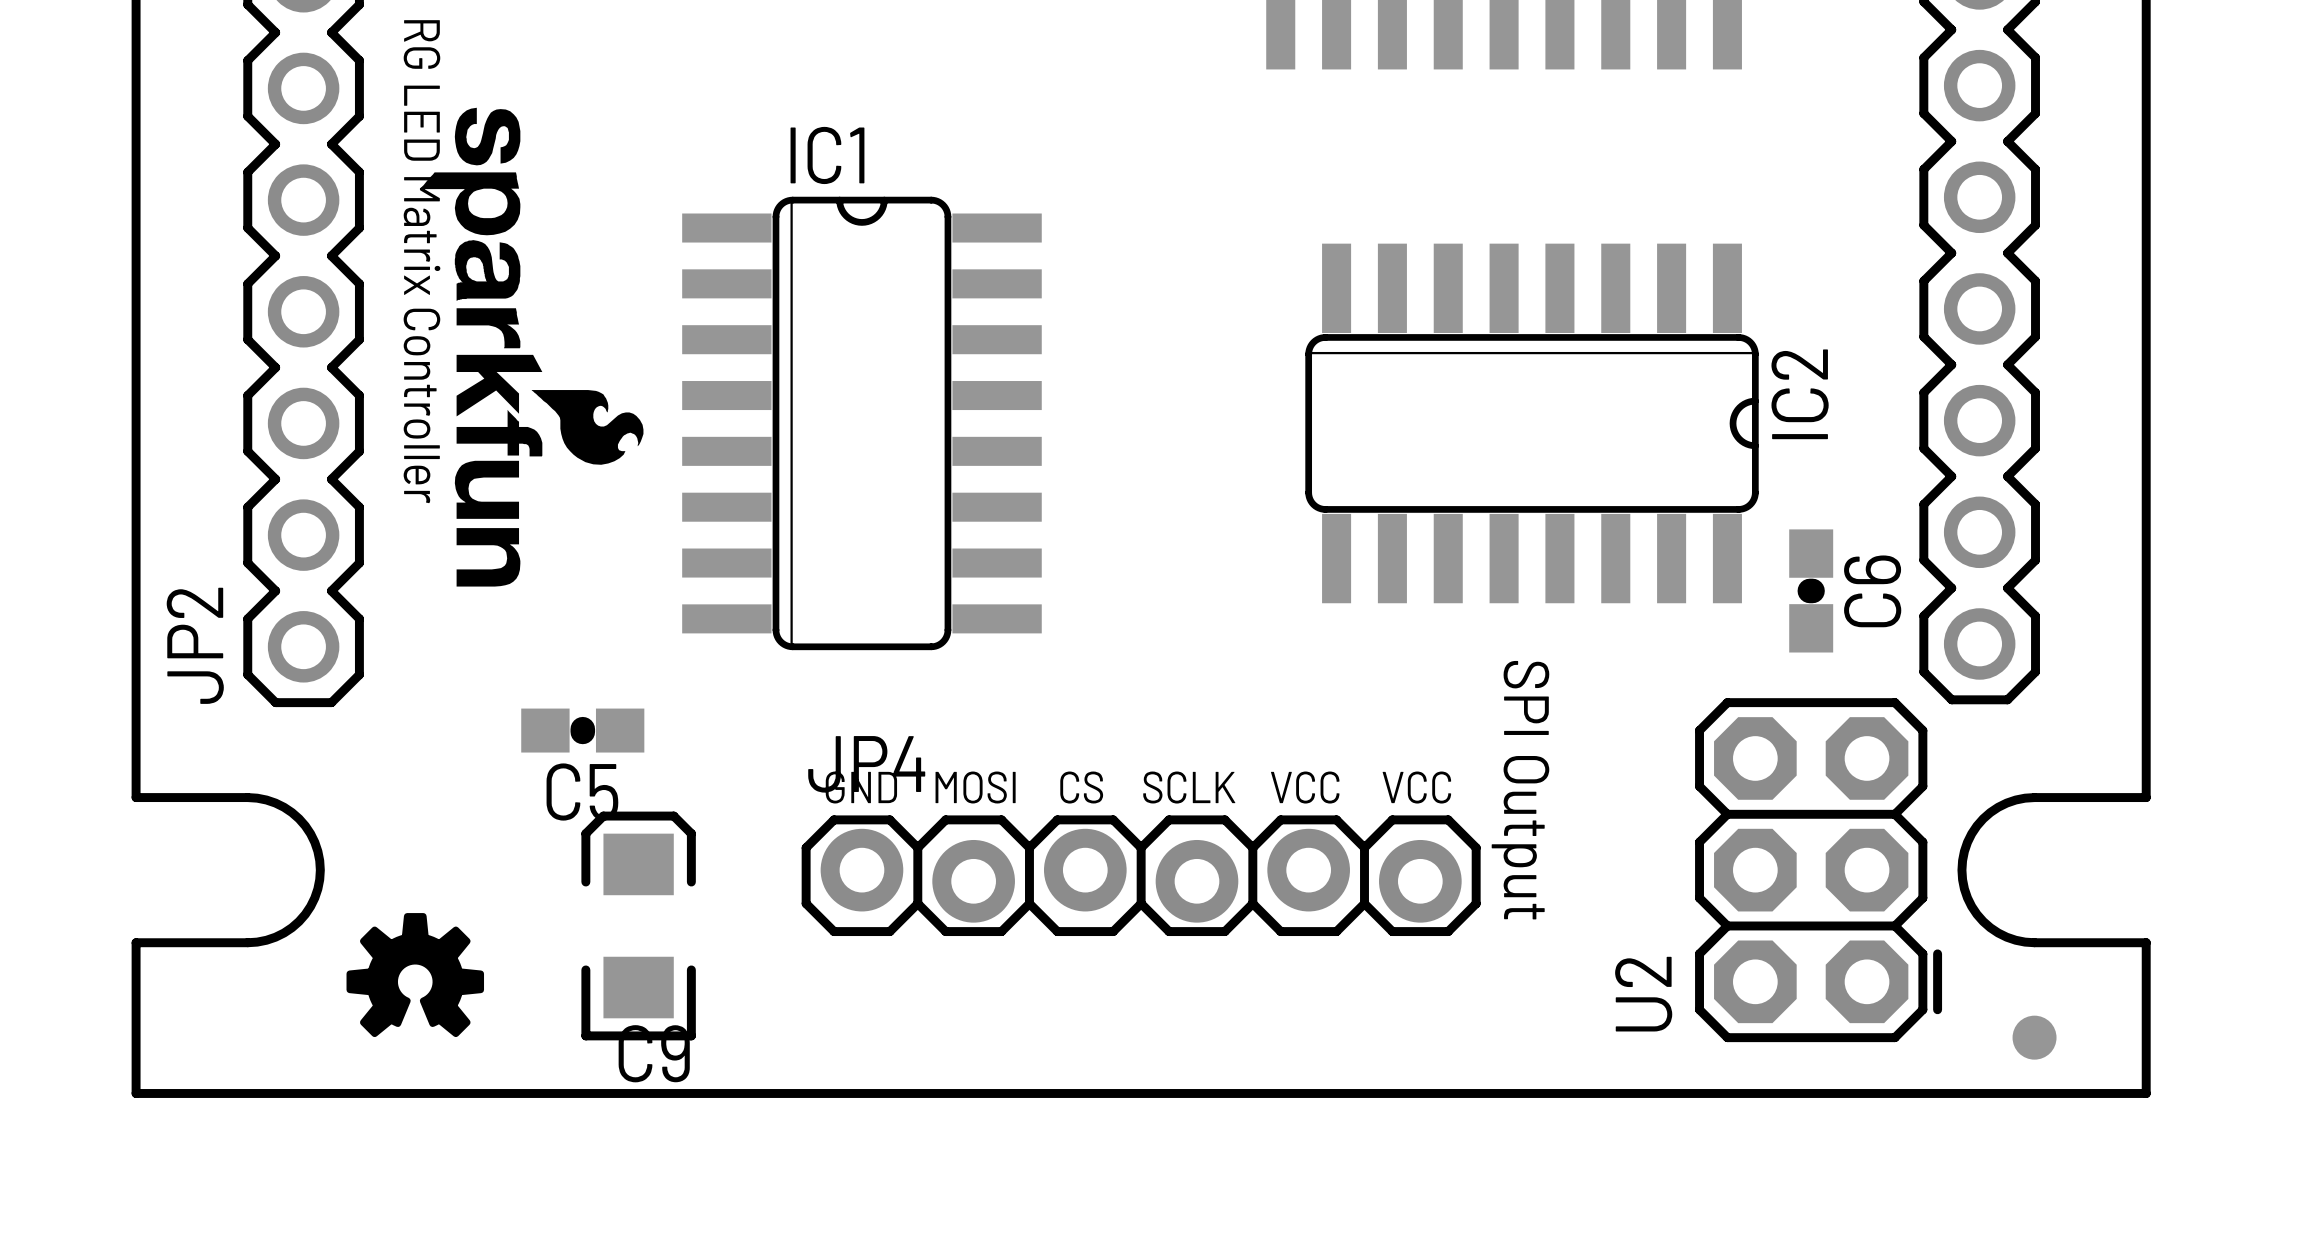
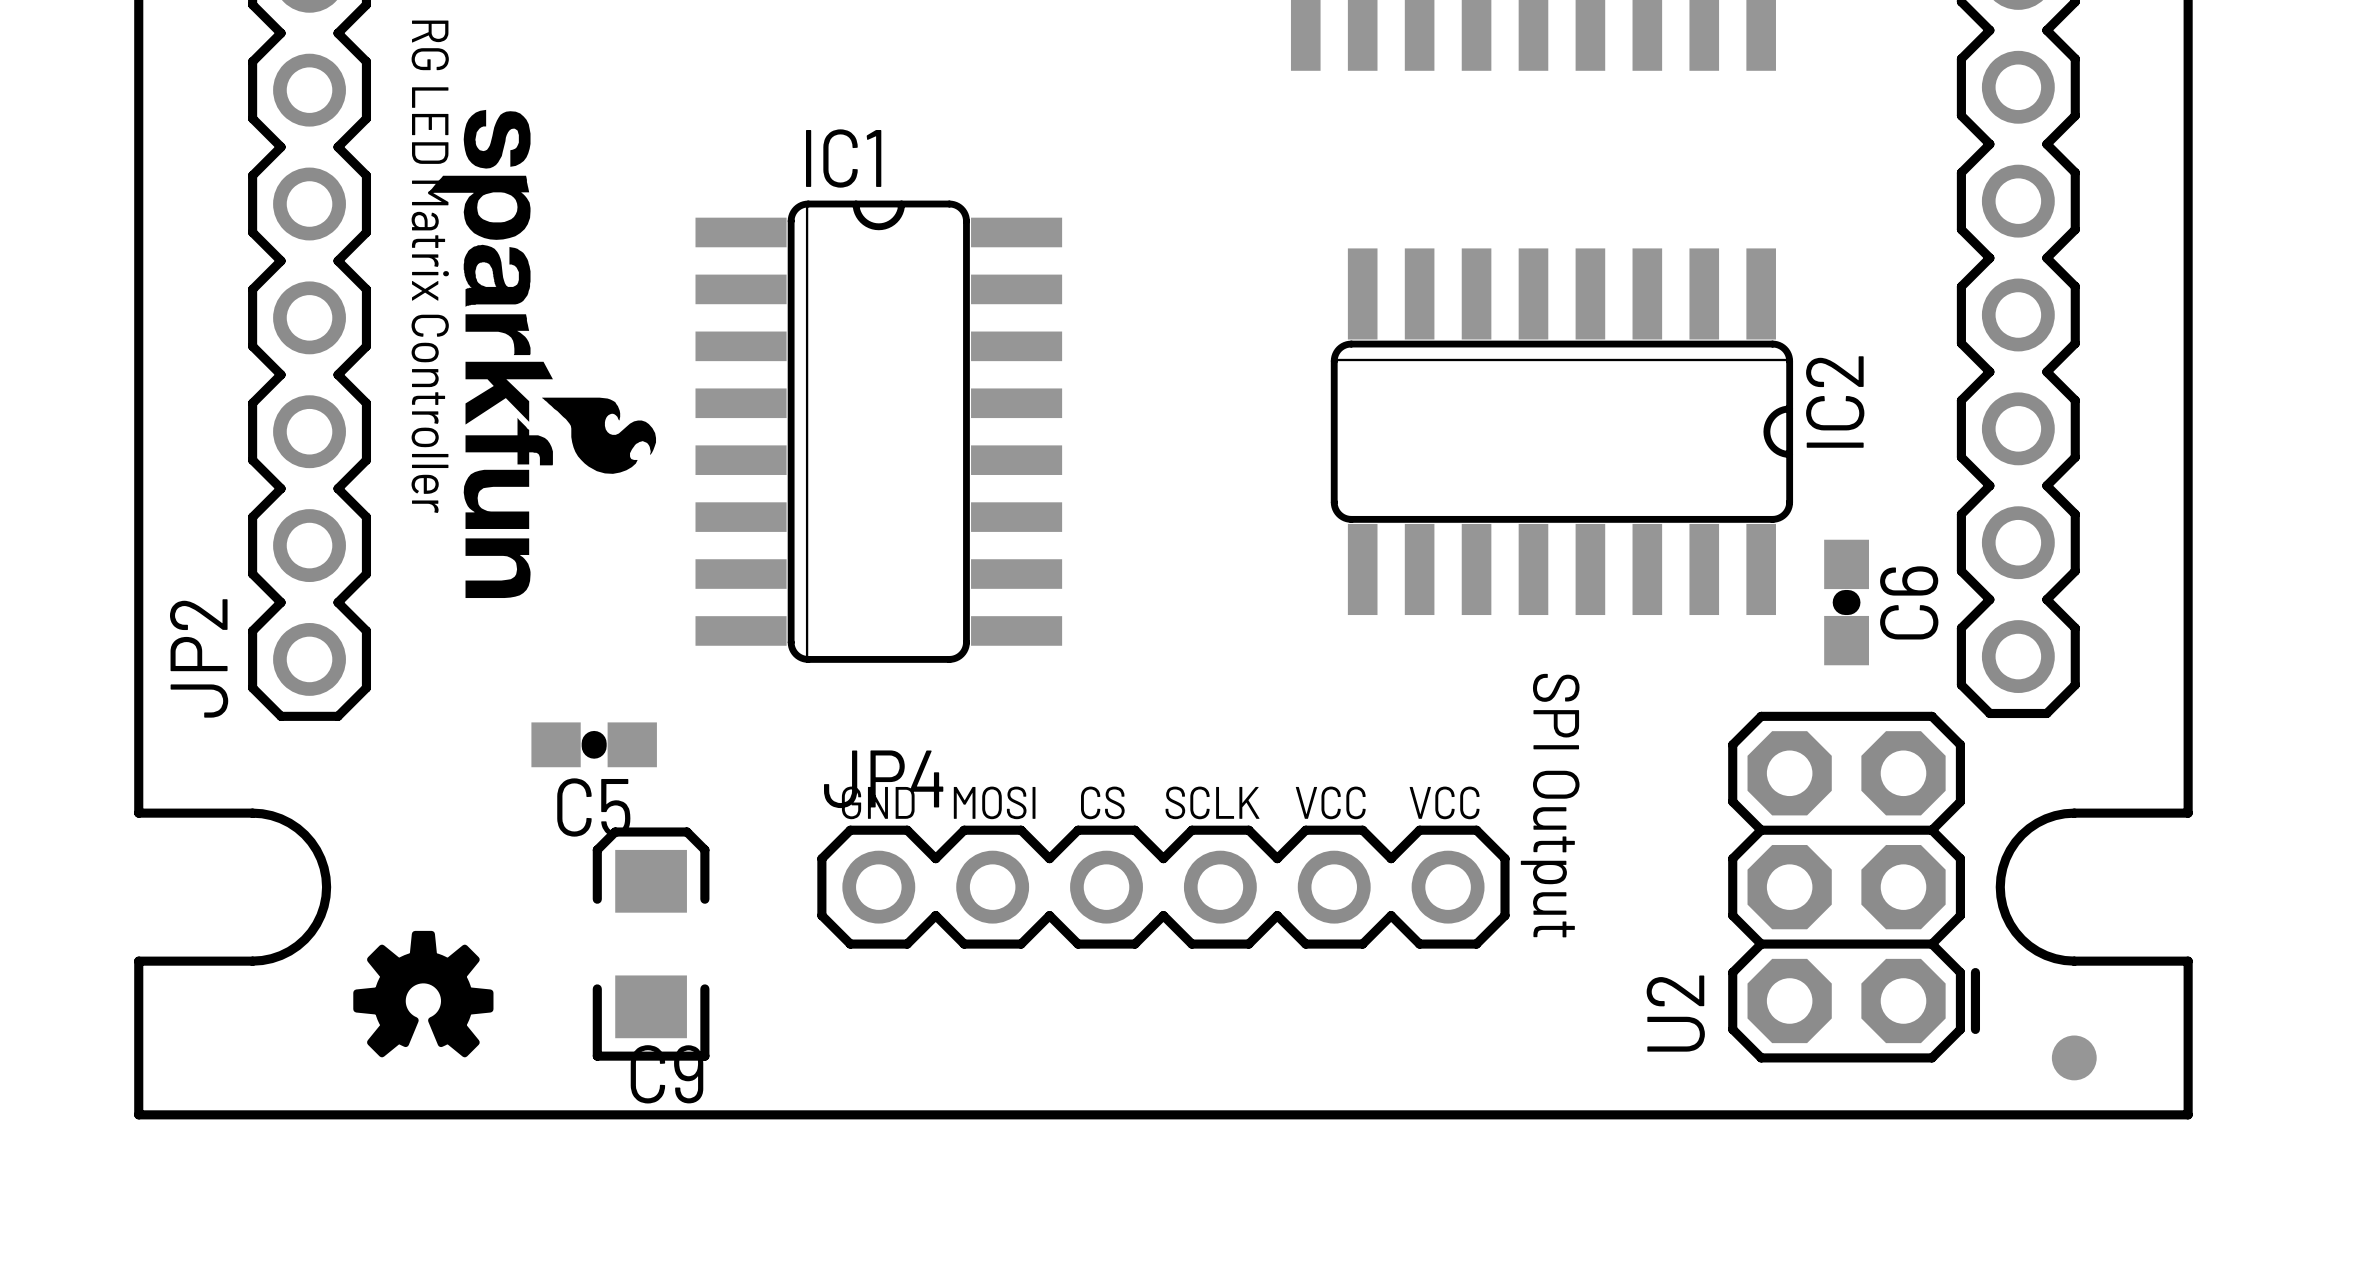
JP4 footprint: [801, 815, 1481, 937] -> [817, 825, 1510, 949]

